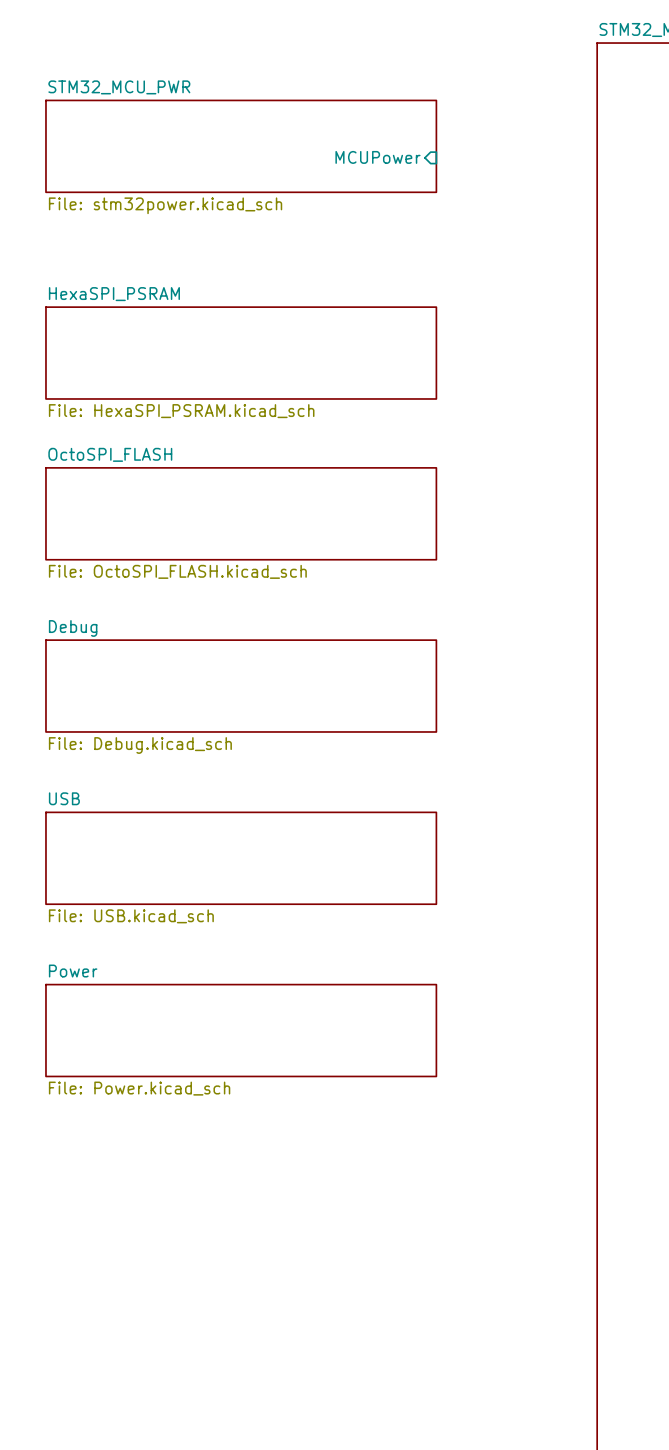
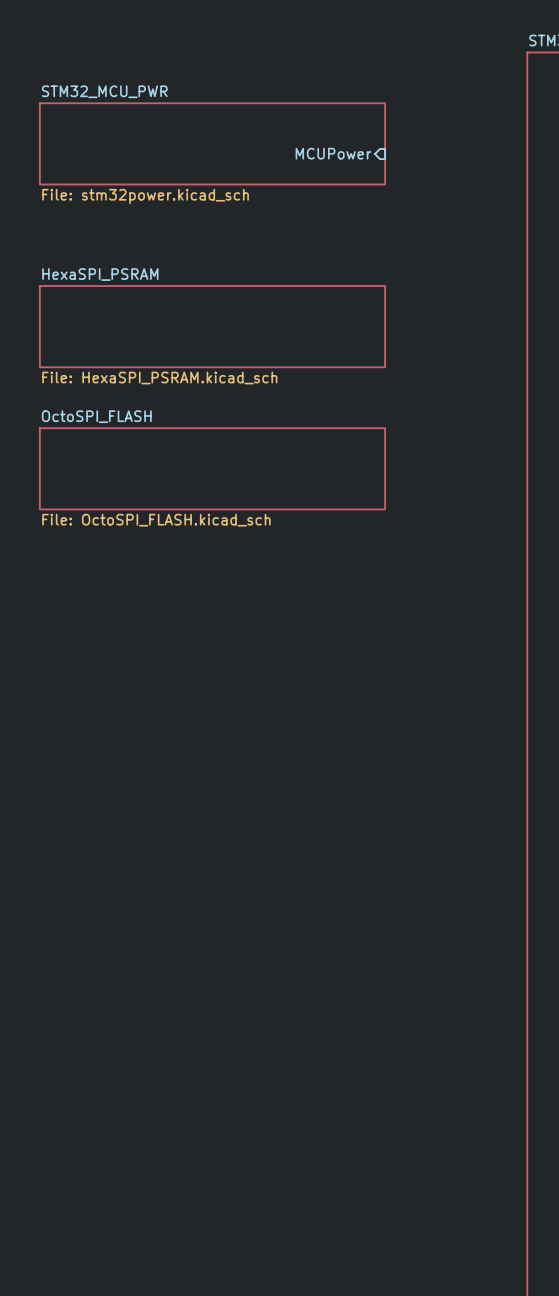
sheet Debug: File: Debug.kicad_sch (241, 686) -> none
sheet USB: File: USB.kicad_sch (241, 858) -> none
sheet Power: File: Power.kicad_sch (241, 1030) -> none

